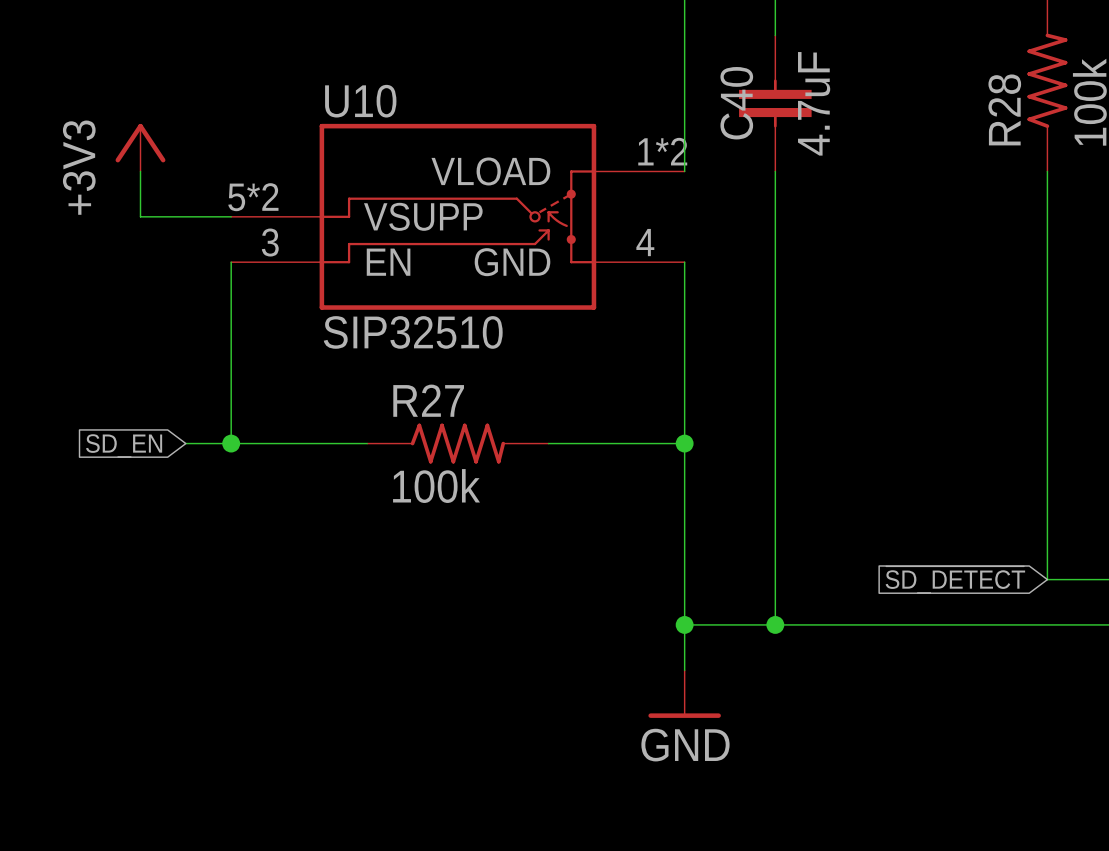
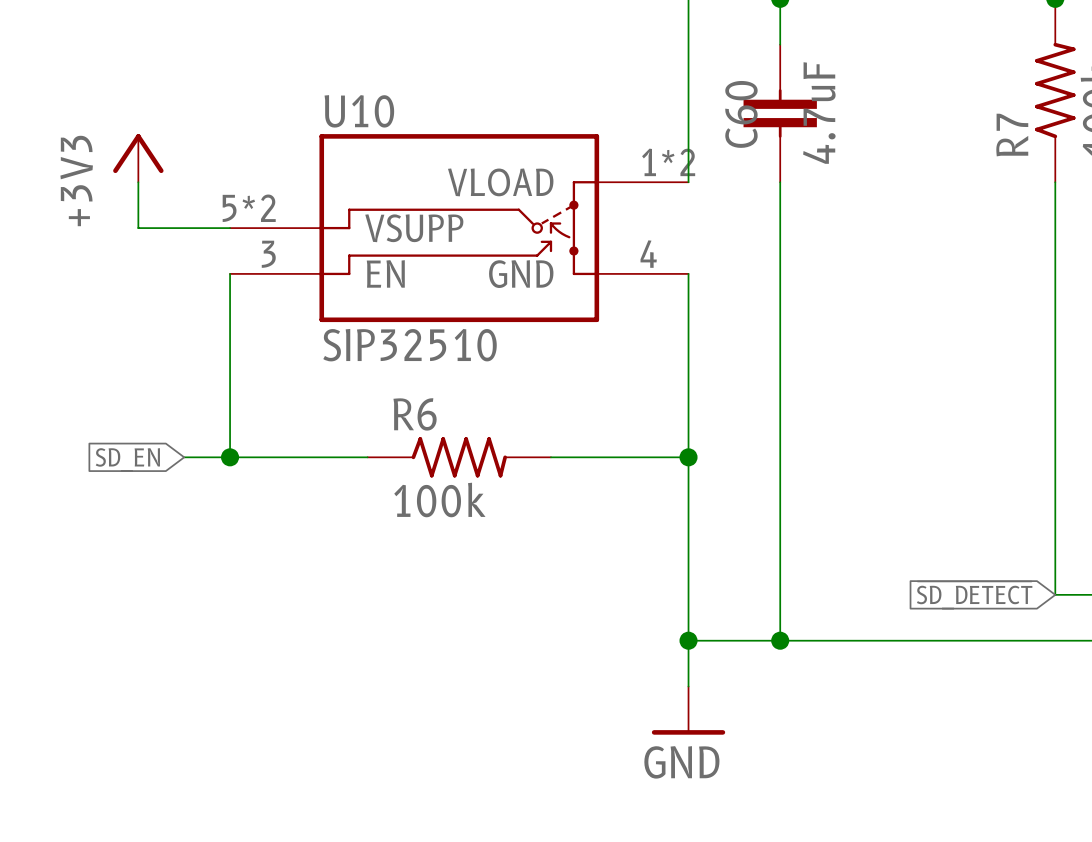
C40 name: C40 (736, 103) -> C60 (741, 114)
R28 name: R28 (1004, 109) -> R7 (1012, 135)
R27 name: R27 (428, 400) -> R6 (415, 414)

